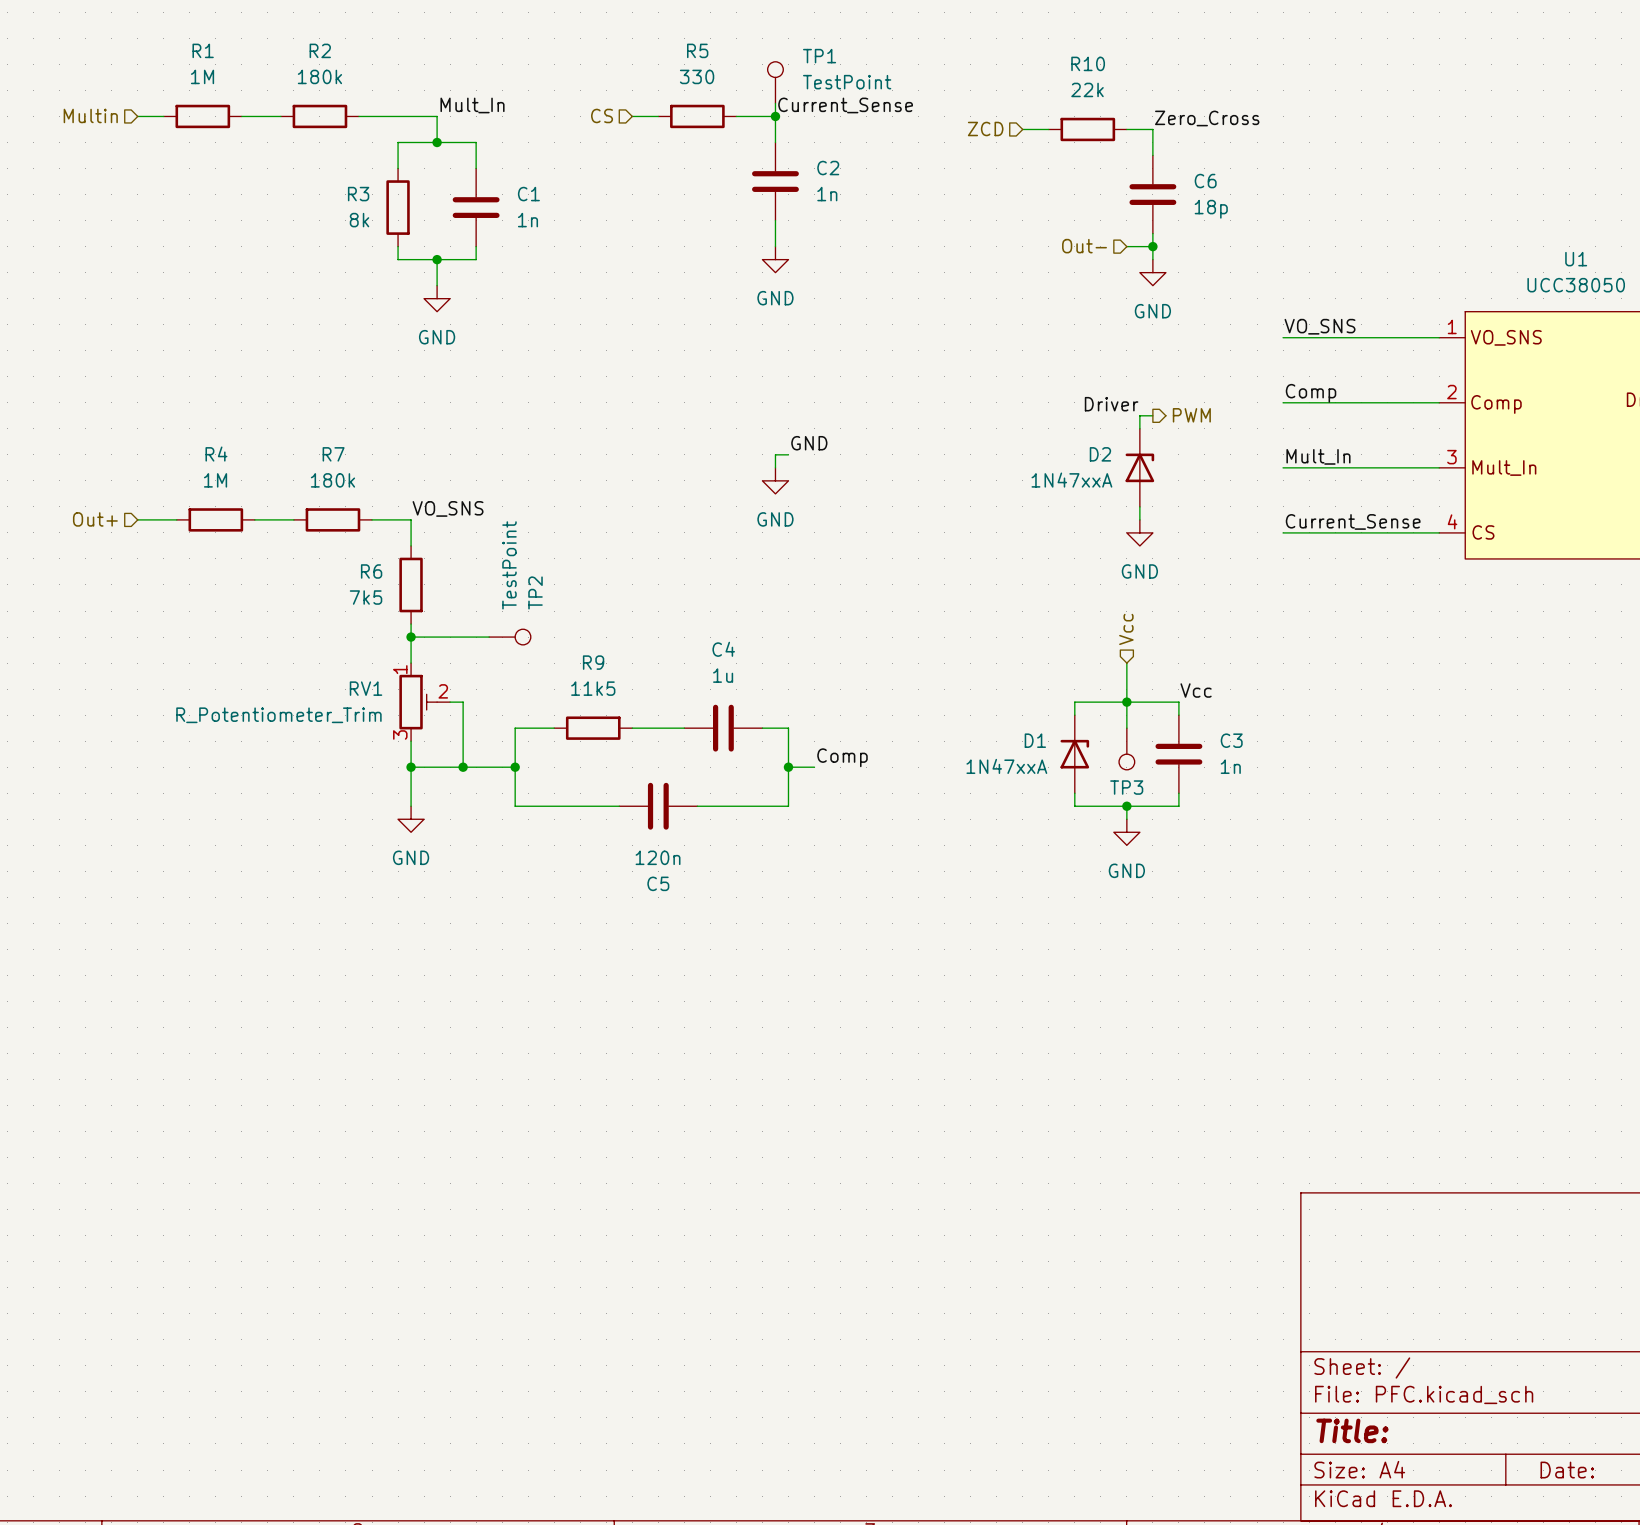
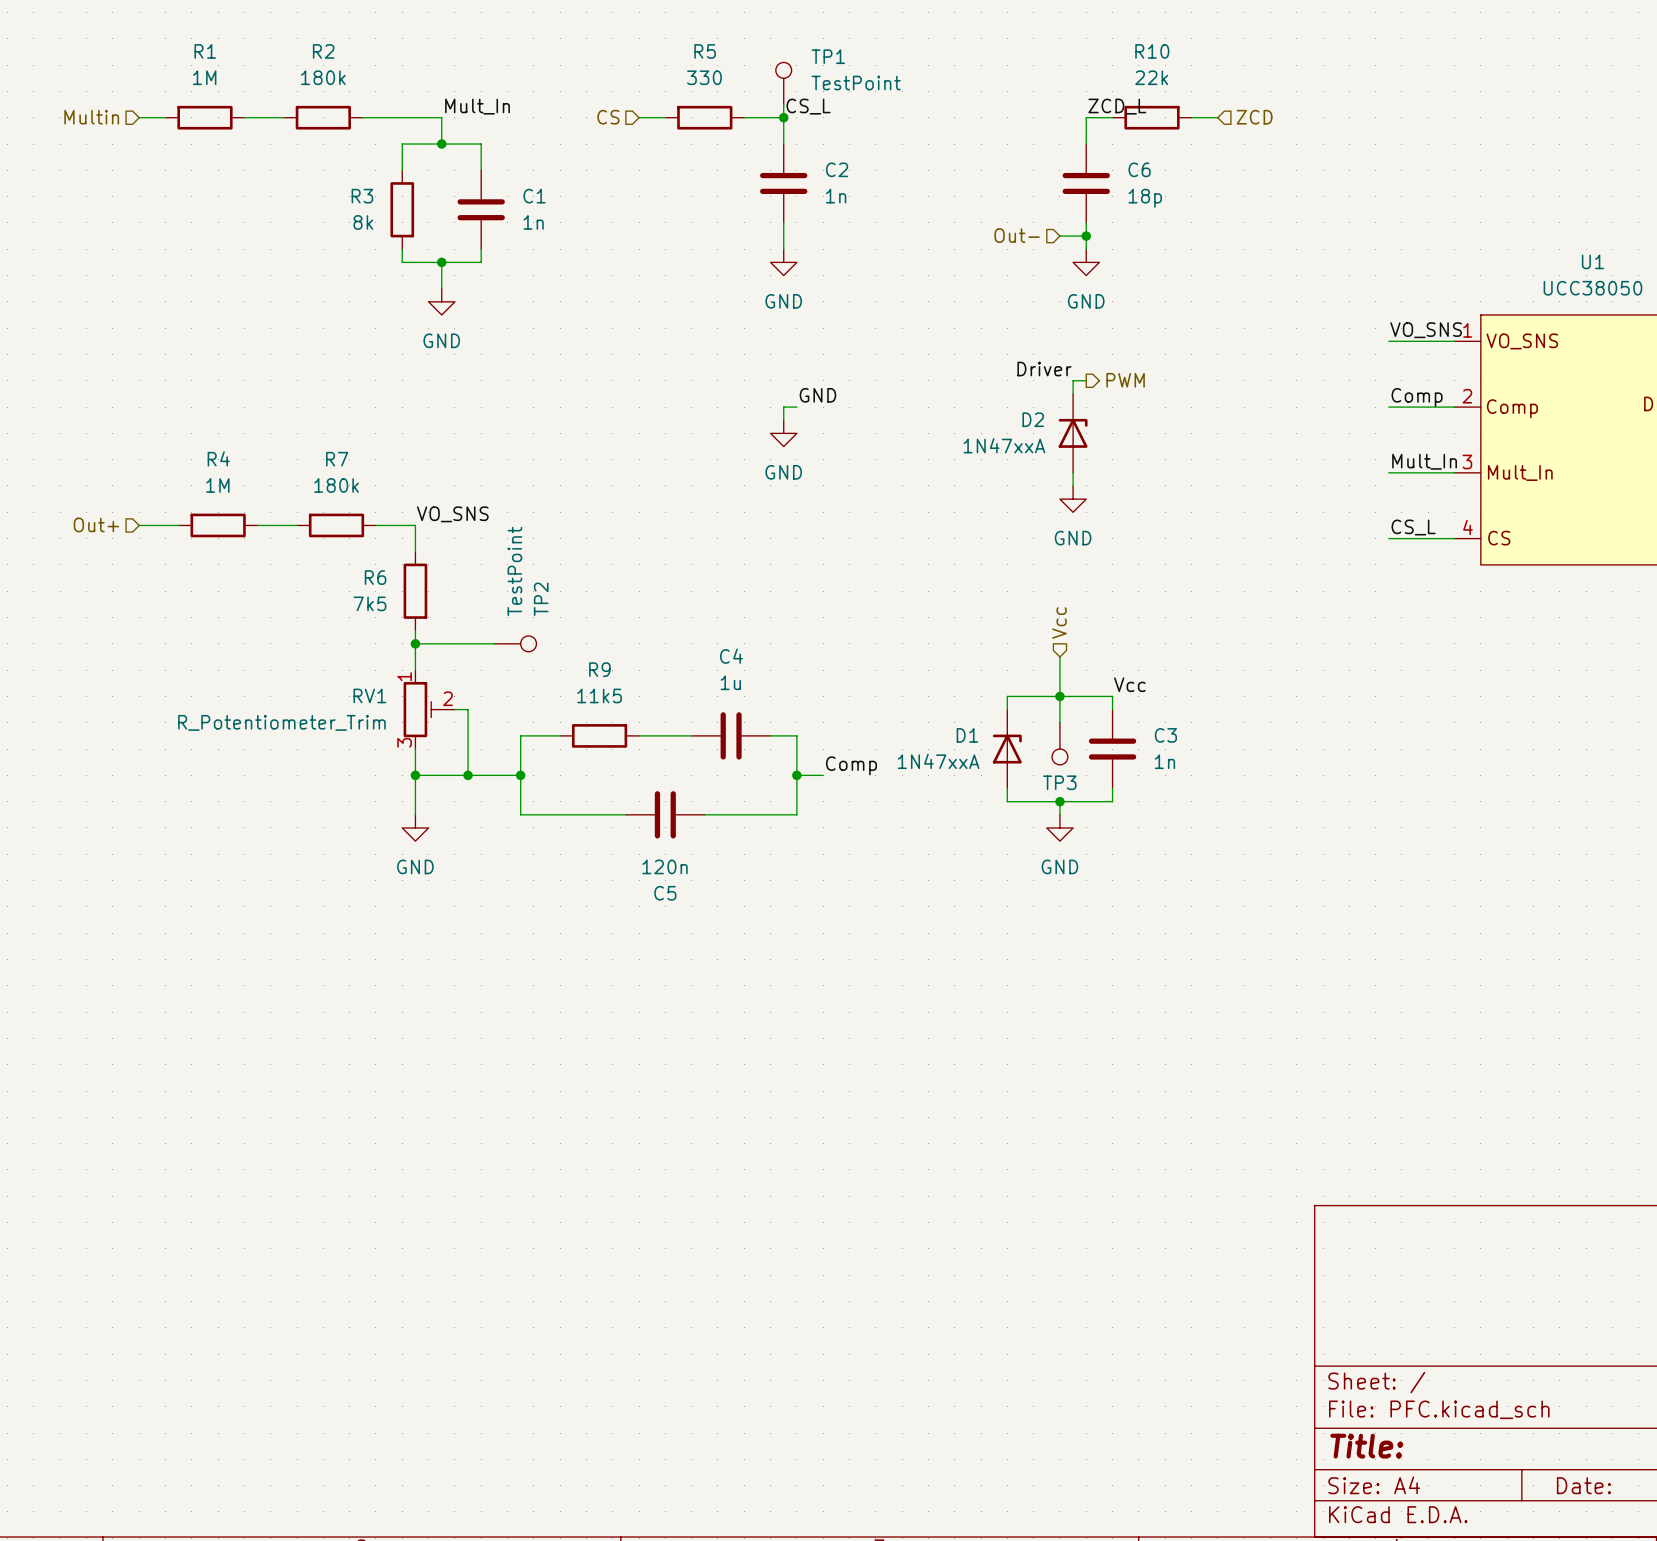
label: Current_Sense (845, 105) -> CS_L (808, 106)
label: none -> ZCD_L (1117, 106)
wire: none -> (1112, 117) (1086, 117) (1086, 144)
label: Zero_Cross (1207, 118) -> none
hierarchical label rotation: 0° (985, 128) -> 180° (1254, 117)
hierarchical label position: ZCD (985, 128) -> ZCD (1254, 117)
wire: (1022, 129) (1048, 129) -> (1191, 117) (1217, 117)
R10 position: (1087, 129) -> (1152, 117)
wire: (1126, 129) (1152, 129) (1152, 155) -> none
C6 position: (1152, 194) -> (1086, 183)
junction: none -> (1086, 236)
wire: (1152, 233) (1152, 259) -> (1086, 222) (1086, 249)
hierarchical label position: Out- (1084, 246) -> Out- (1017, 235)
wire: (1126, 246) (1152, 246) -> (1059, 236) (1086, 236)
junction: (1152, 246) -> none
power symbol position: GND (1152, 272) -> GND (1086, 262)
label position: VO_SNS (1320, 326) -> VO_SNS (1426, 330)
wire: (1283, 337) (1374, 337) -> none
label position: Comp (1311, 393) -> Comp (1417, 397)
wire: (1283, 402) (1374, 402) -> none
label position: Driver (1111, 404) -> Driver (1044, 369)
wire: (1152, 415) (1139, 415) (1139, 428) -> (1086, 380) (1073, 380) (1073, 393)
hierarchical label position: PWM (1191, 415) -> PWM (1125, 380)
label position: GND (809, 443) -> GND (817, 395)
wire: (788, 454) (775, 454) (775, 467) -> (796, 407) (783, 407) (783, 420)
label position: Mult_In (1318, 456) -> Mult_In (1424, 461)
D2 position: (1139, 467) -> (1073, 433)
wire: (1283, 467) (1374, 467) -> none
power symbol position: GND (775, 480) -> GND (783, 433)
wire: (1139, 506) (1139, 519) -> (1073, 472) (1073, 485)
label: Current_Sense (1353, 521) -> none
label: none -> CS_L (1413, 527)
power symbol position: GND (1139, 532) -> GND (1073, 499)
wire: (1283, 532) (1374, 532) -> none
hierarchical label position: Vcc (1126, 629) -> Vcc (1059, 622)
wire: (1126, 663) (1126, 728) -> (1059, 656) (1059, 722)
junction: none -> (1059, 696)
label position: Vcc (1196, 690) -> Vcc (1129, 684)
junction: (1126, 702) -> none
wire: (1074, 715) (1074, 702) (1178, 702) (1178, 715) -> (1007, 709) (1007, 696) (1112, 696) (1112, 709)
TP3 position: (1126, 748) -> (1059, 743)
D1 position: (1074, 754) -> (1007, 749)
C3 position: (1178, 754) -> (1112, 749)
junction: none -> (1059, 801)
wire: (1074, 793) (1074, 806) (1178, 806) (1178, 793) -> (1007, 788) (1007, 801) (1112, 801) (1112, 788)
wire: (1126, 806) (1126, 819) -> (1059, 801) (1059, 814)
junction: (1126, 806) -> none
power symbol position: GND (1126, 832) -> GND (1059, 827)

